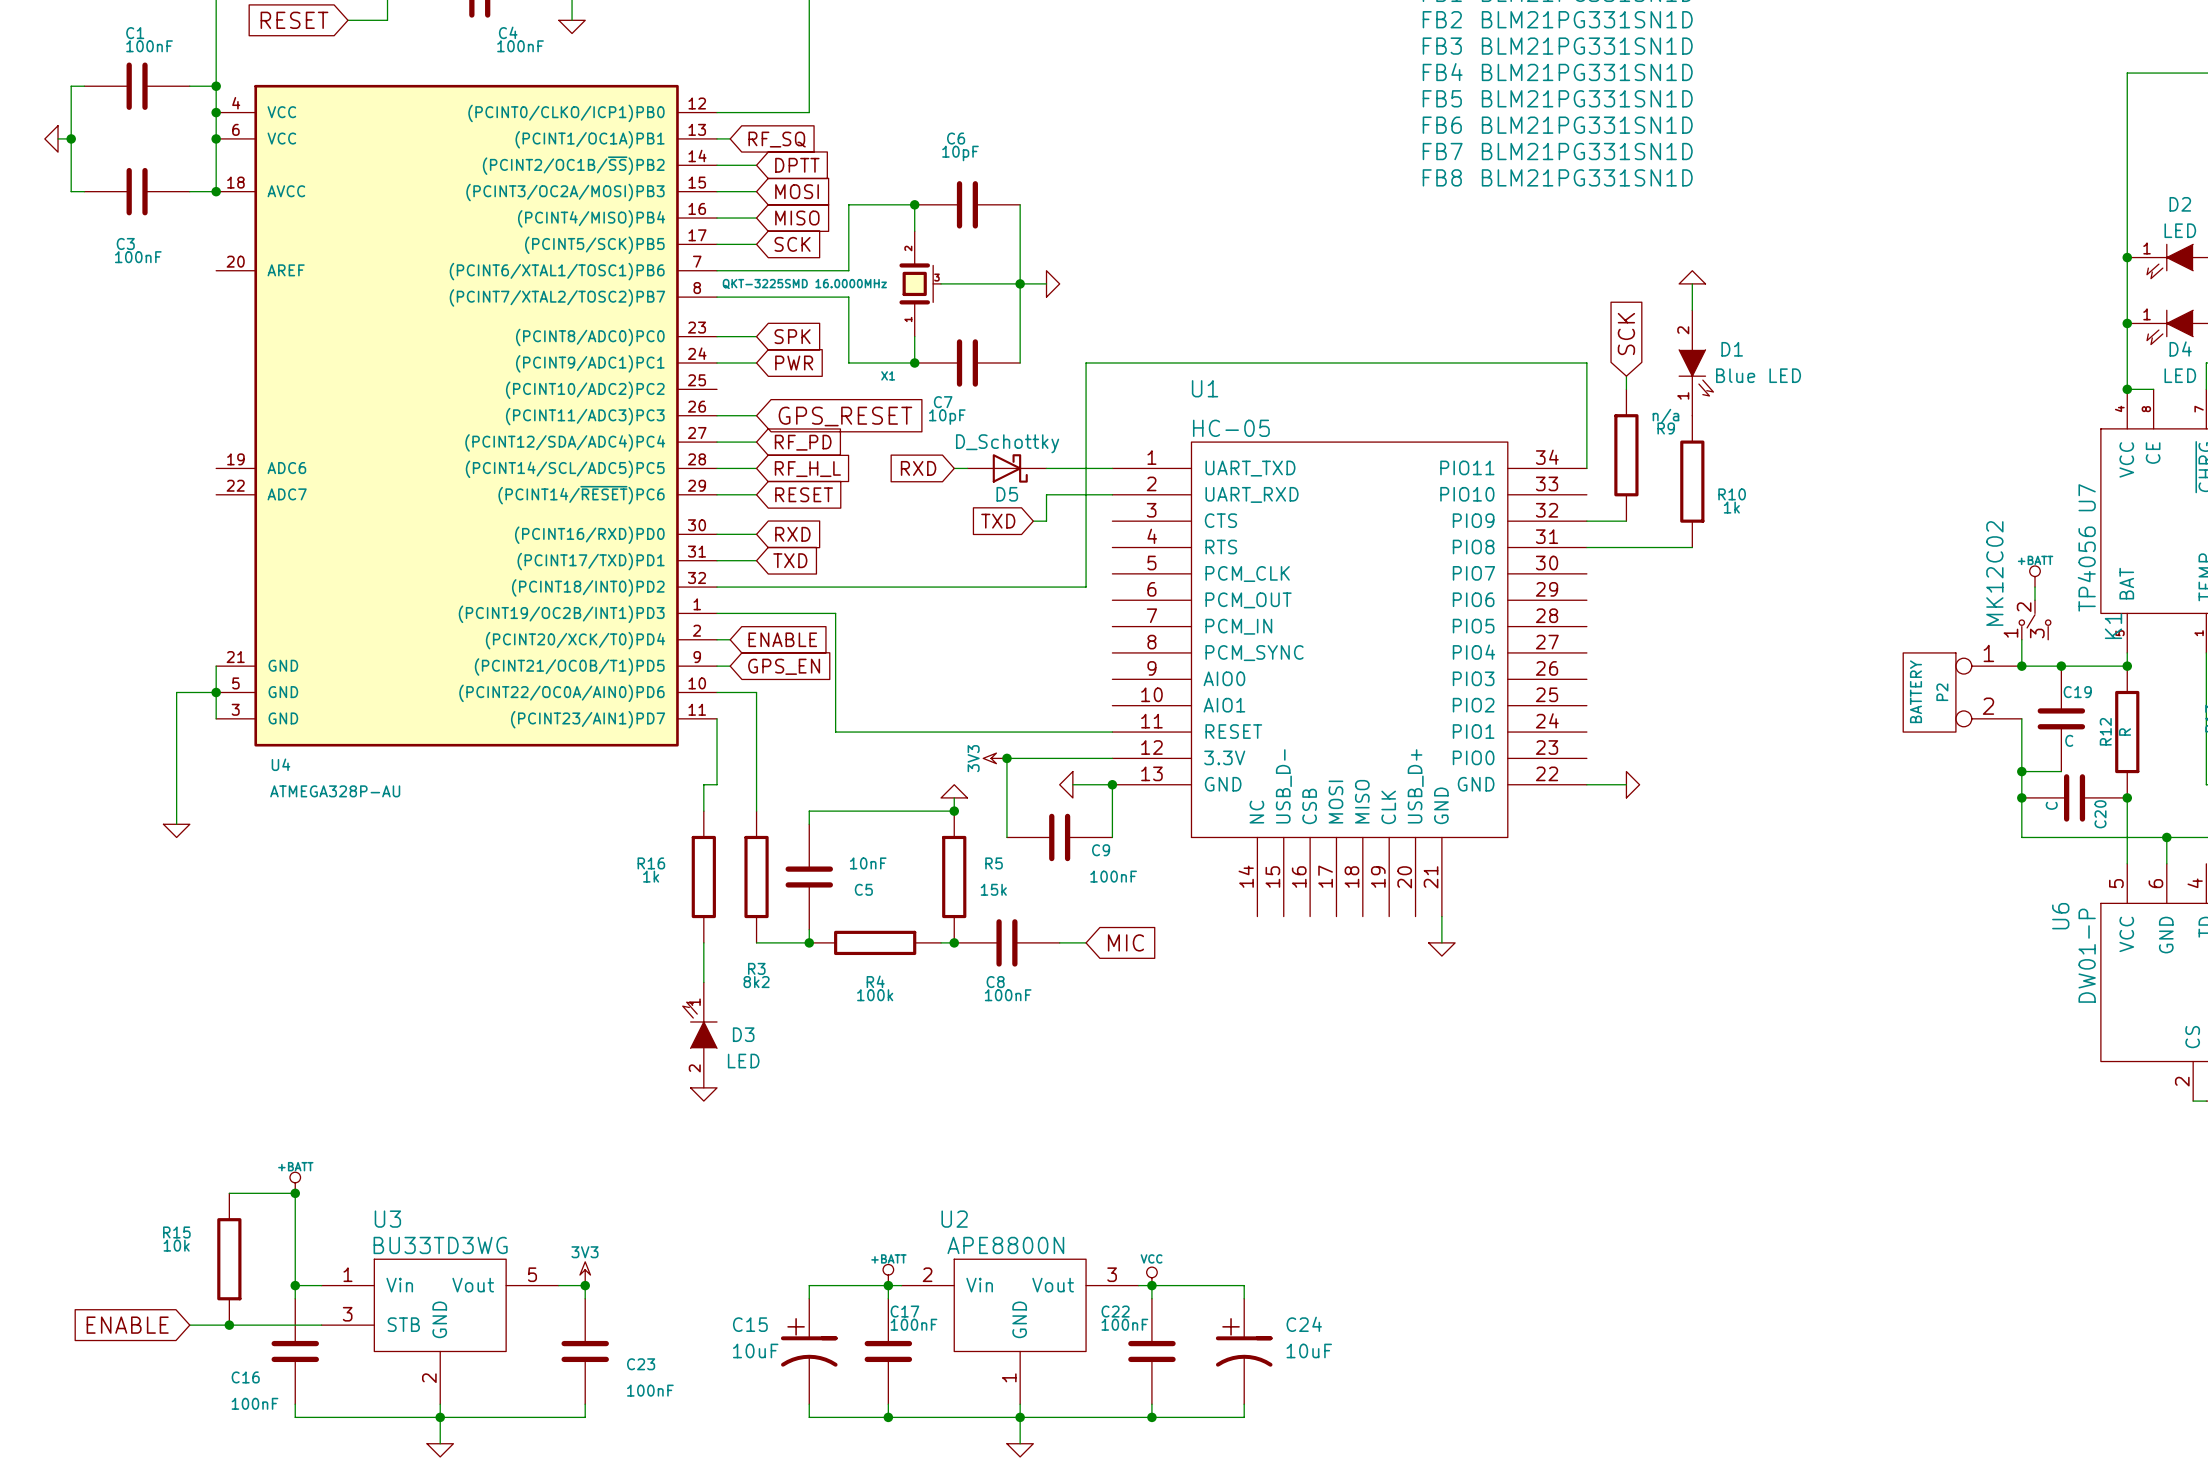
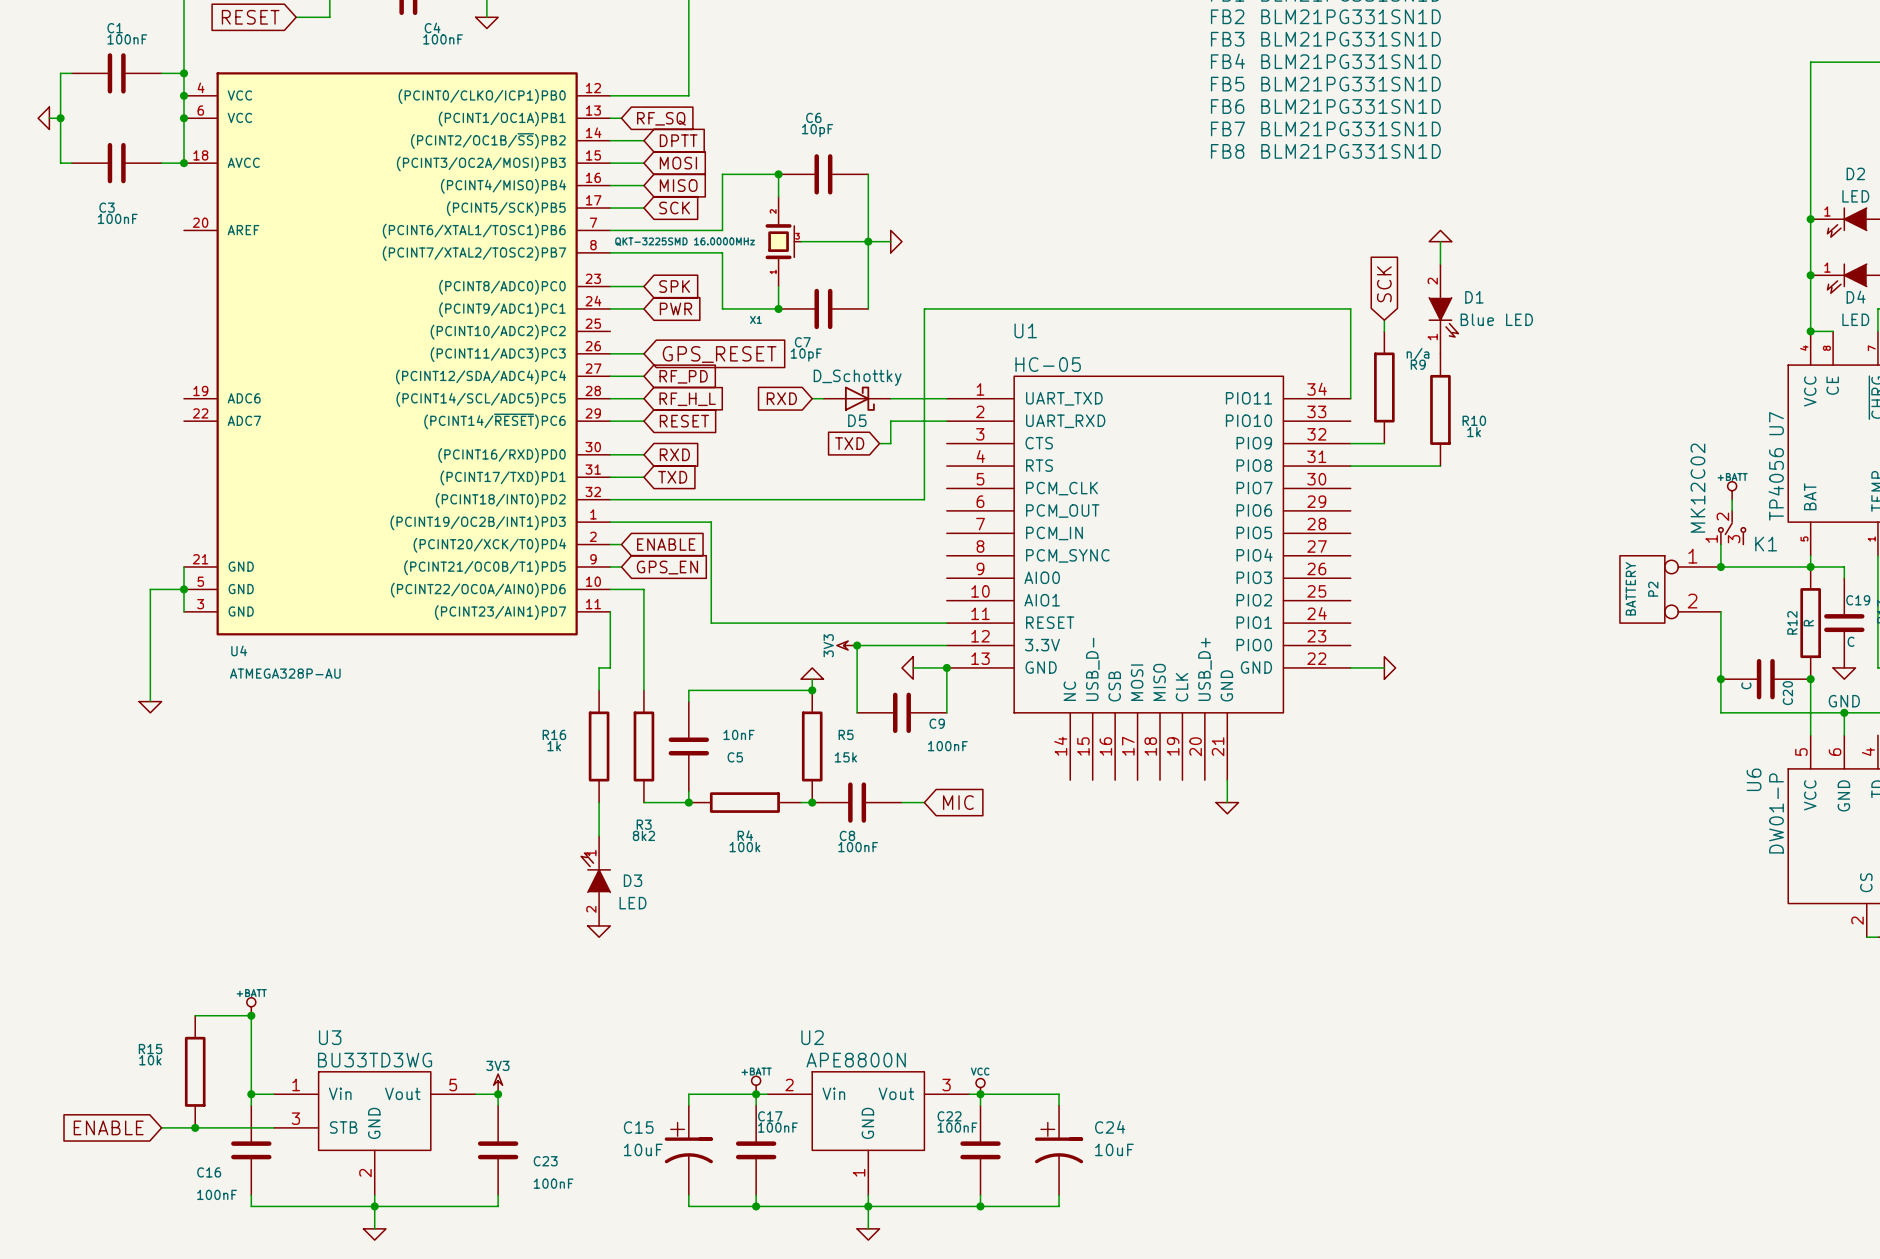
K1 name rotation: 0° (2113, 626) -> 90° clockwise (1766, 544)
K1 name position: K1 (2113, 626) -> K1 (1766, 544)
junction: (2061, 666) -> none
wire: none -> (1810, 566) (1844, 566) (1844, 578)
C19 position: (2061, 718) -> (1844, 623)
wire: (2021, 771) (2061, 771) -> none
junction: (2021, 771) -> none
power symbol: none -> GND (1844, 673)

